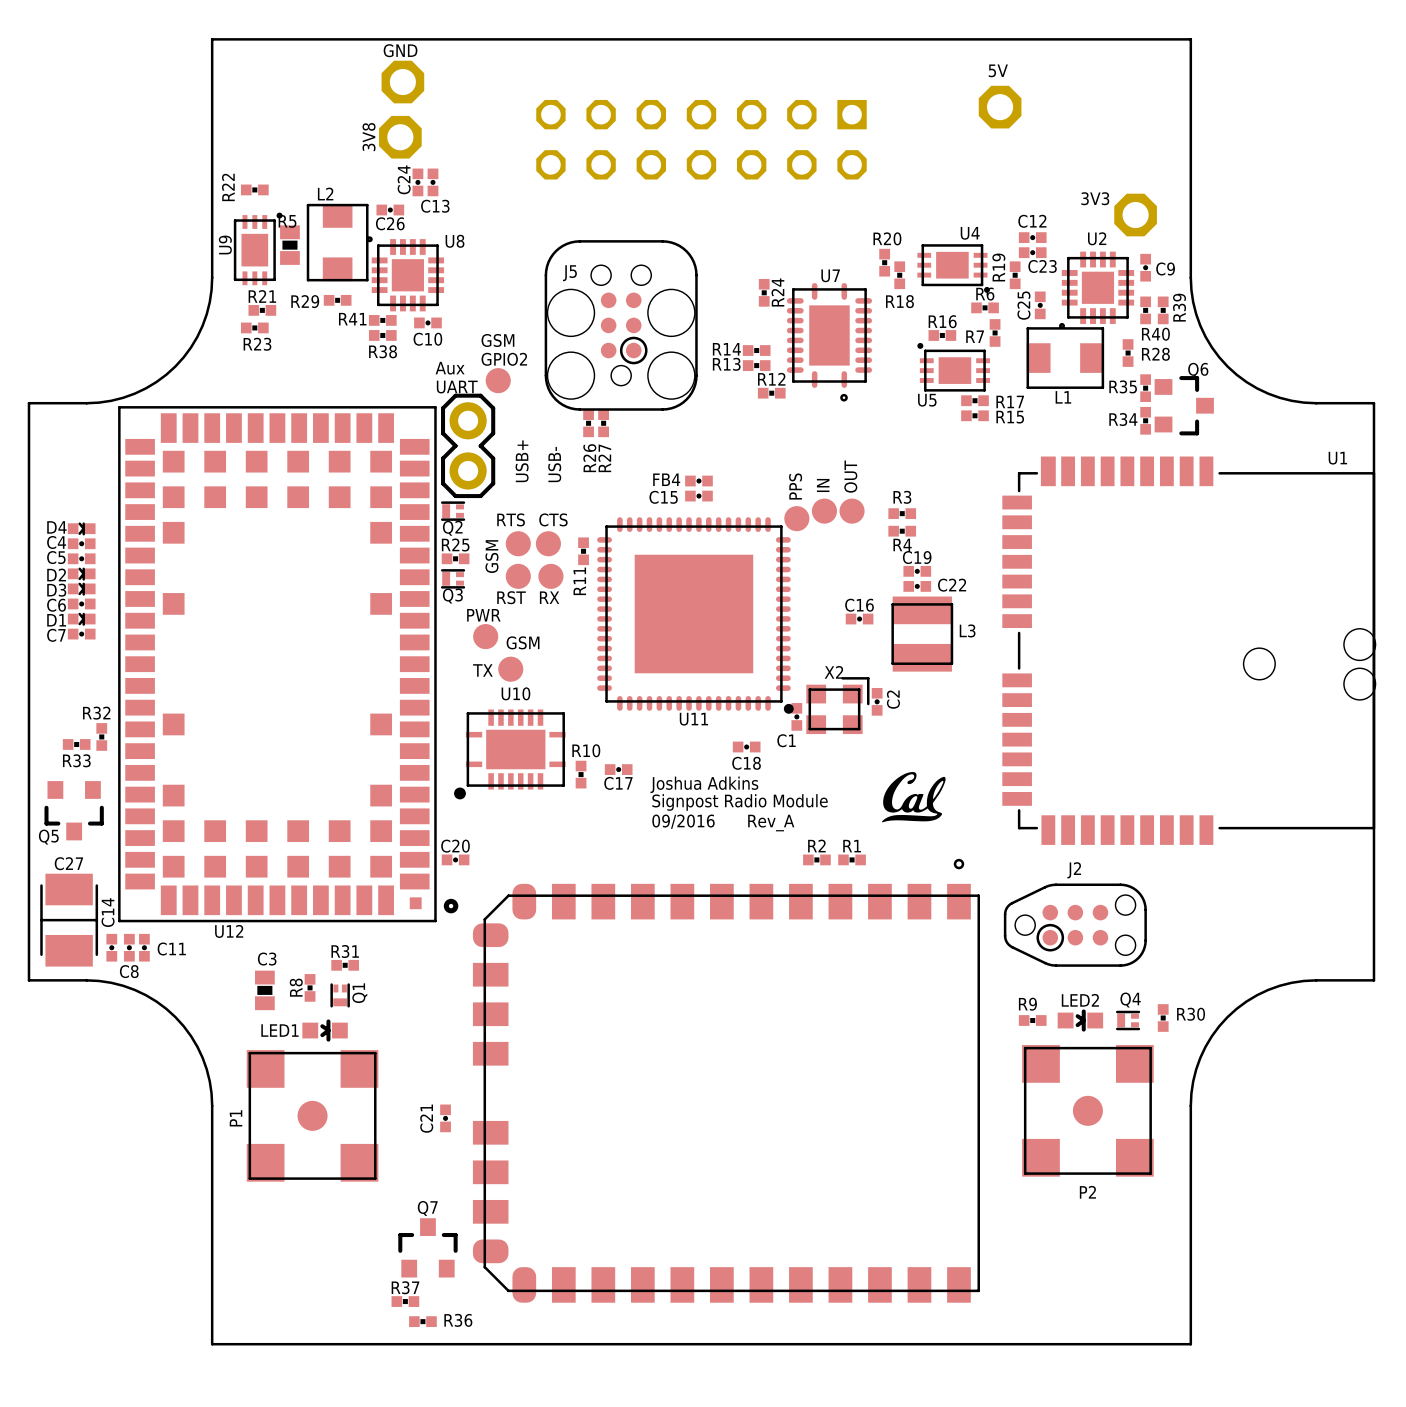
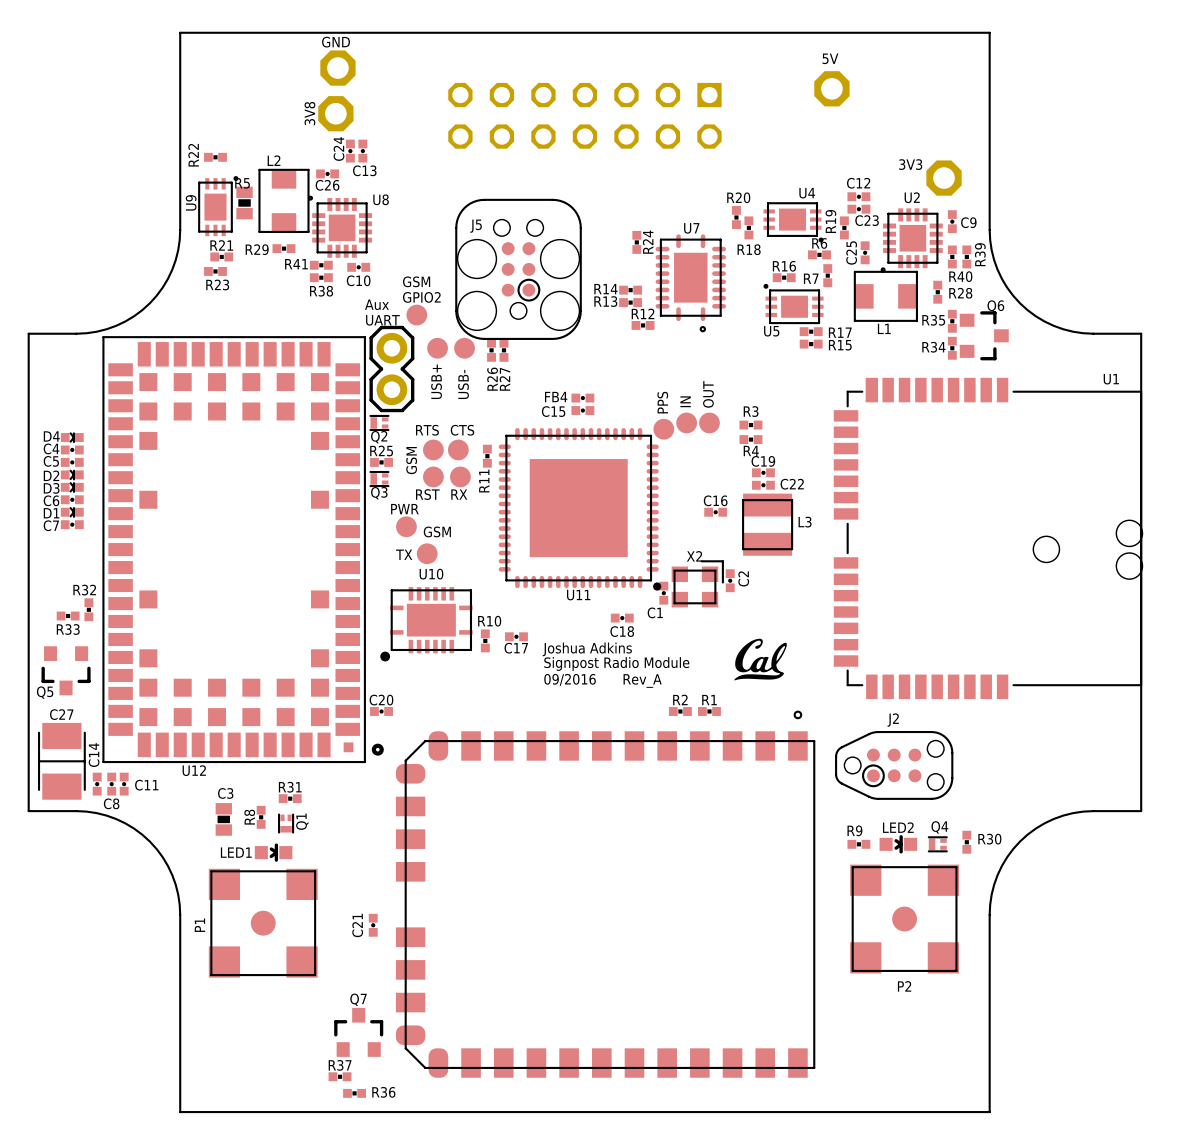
part: none -> (437, 348)
part: none -> (464, 348)

